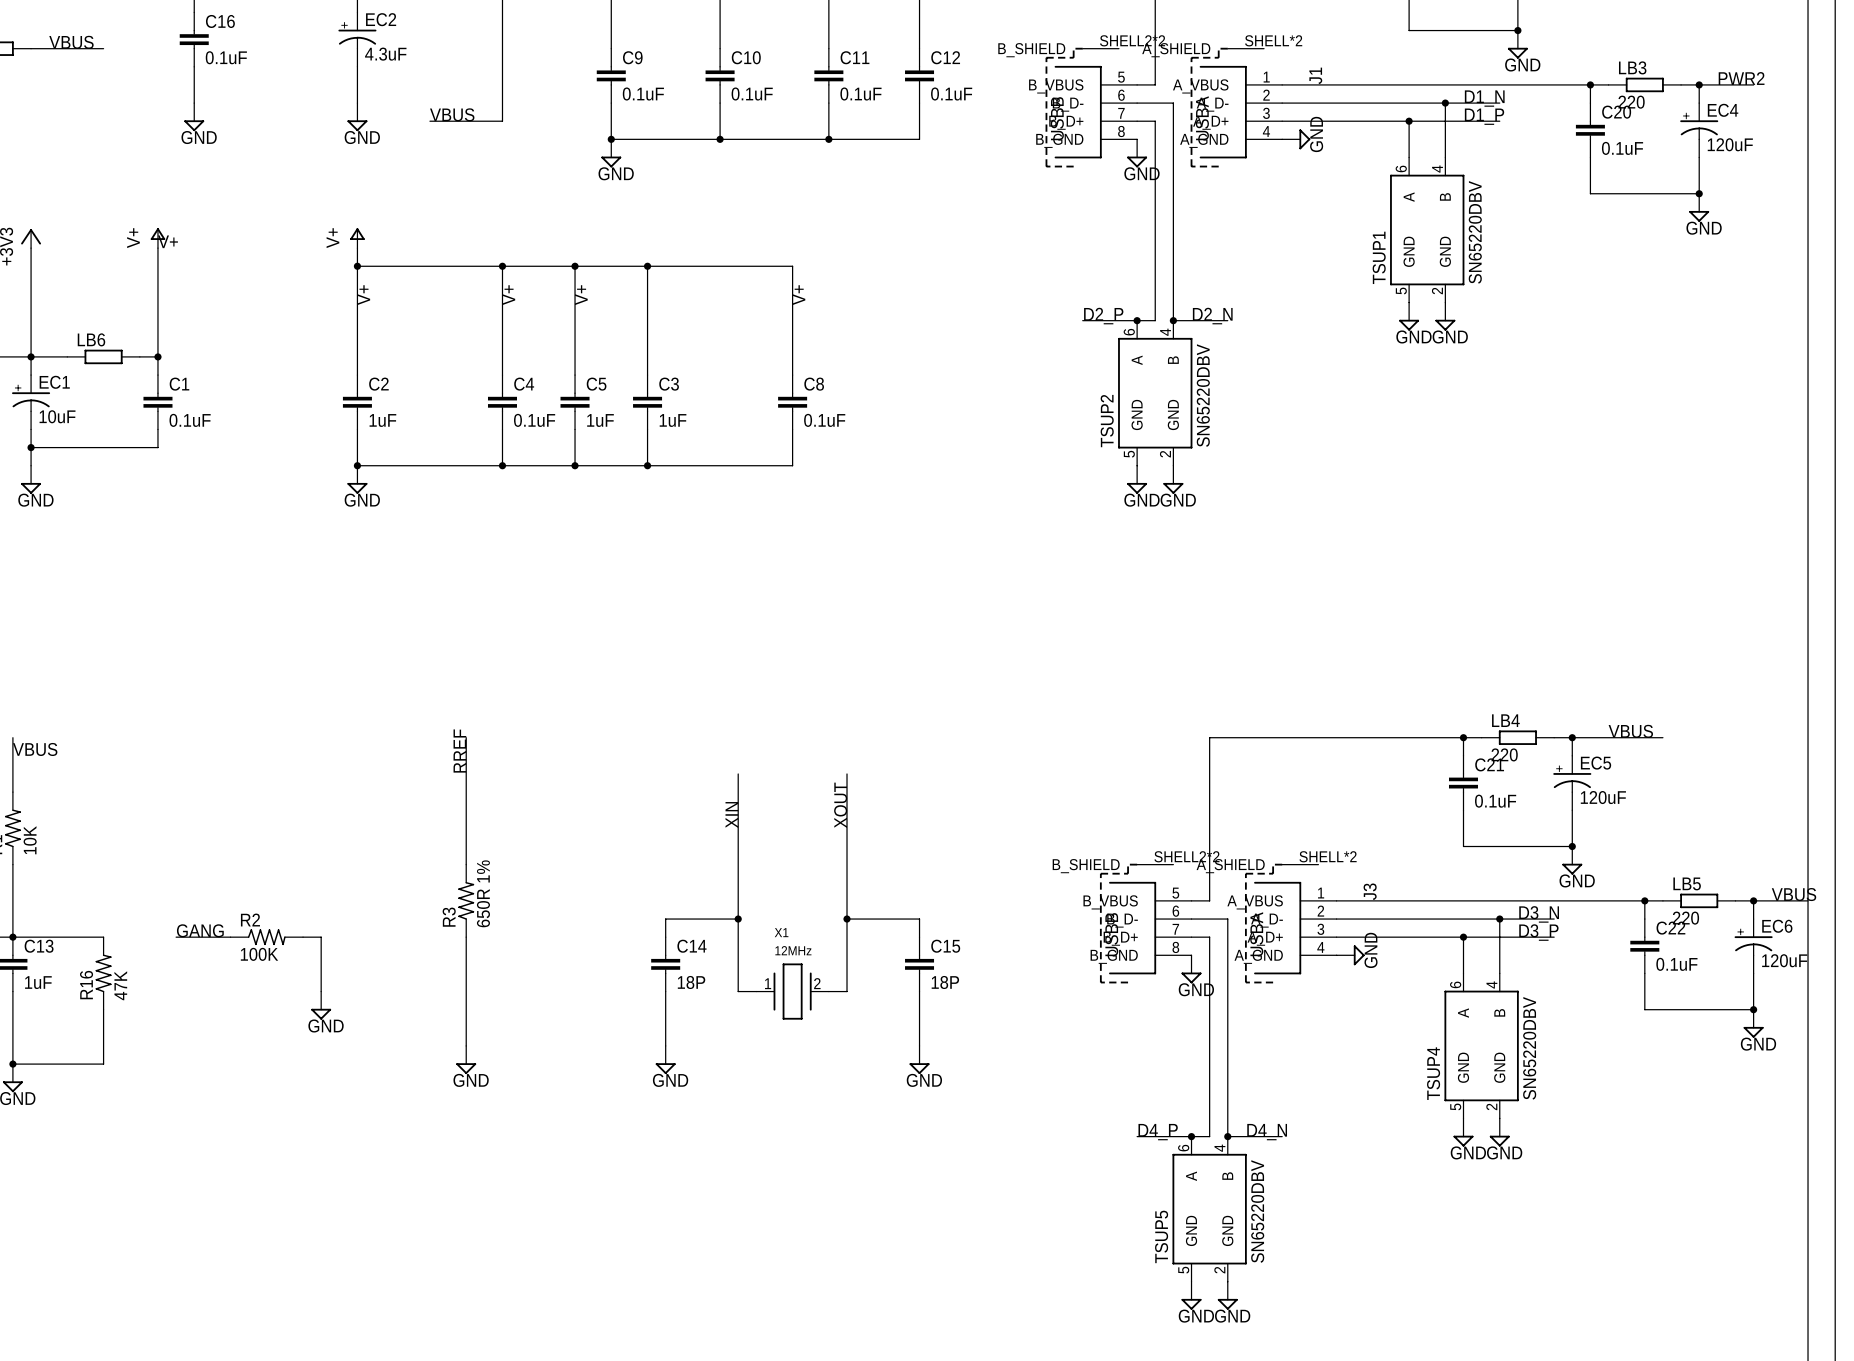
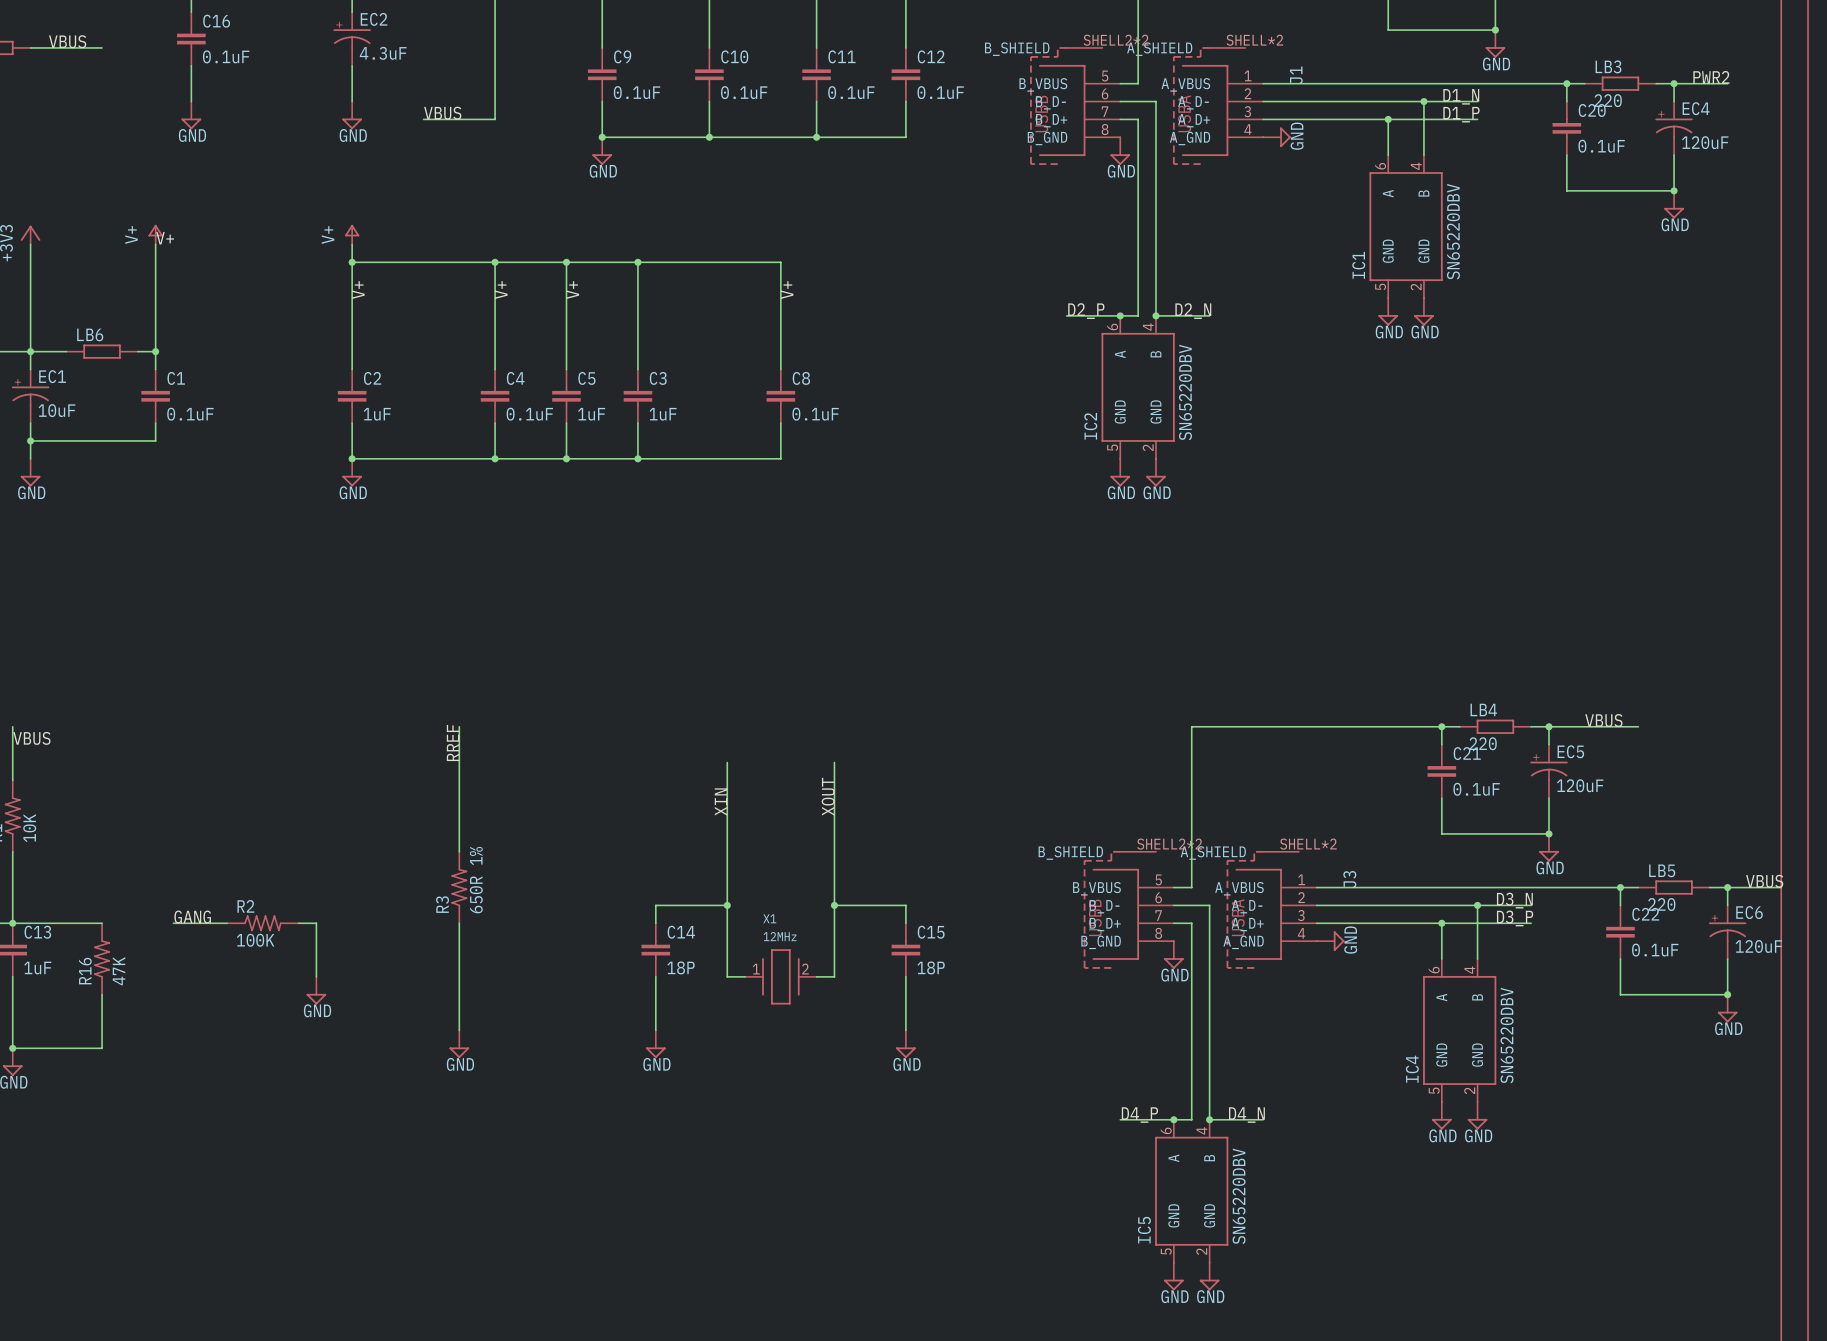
TSUP1 name: TSUP1 (1379, 257) -> IC1 (1358, 265)
TSUP2 name: TSUP2 (1107, 421) -> IC2 (1090, 426)
TSUP4 name: TSUP4 (1433, 1073) -> IC4 (1412, 1069)
TSUP5 name: TSUP5 (1161, 1236) -> IC5 (1144, 1230)

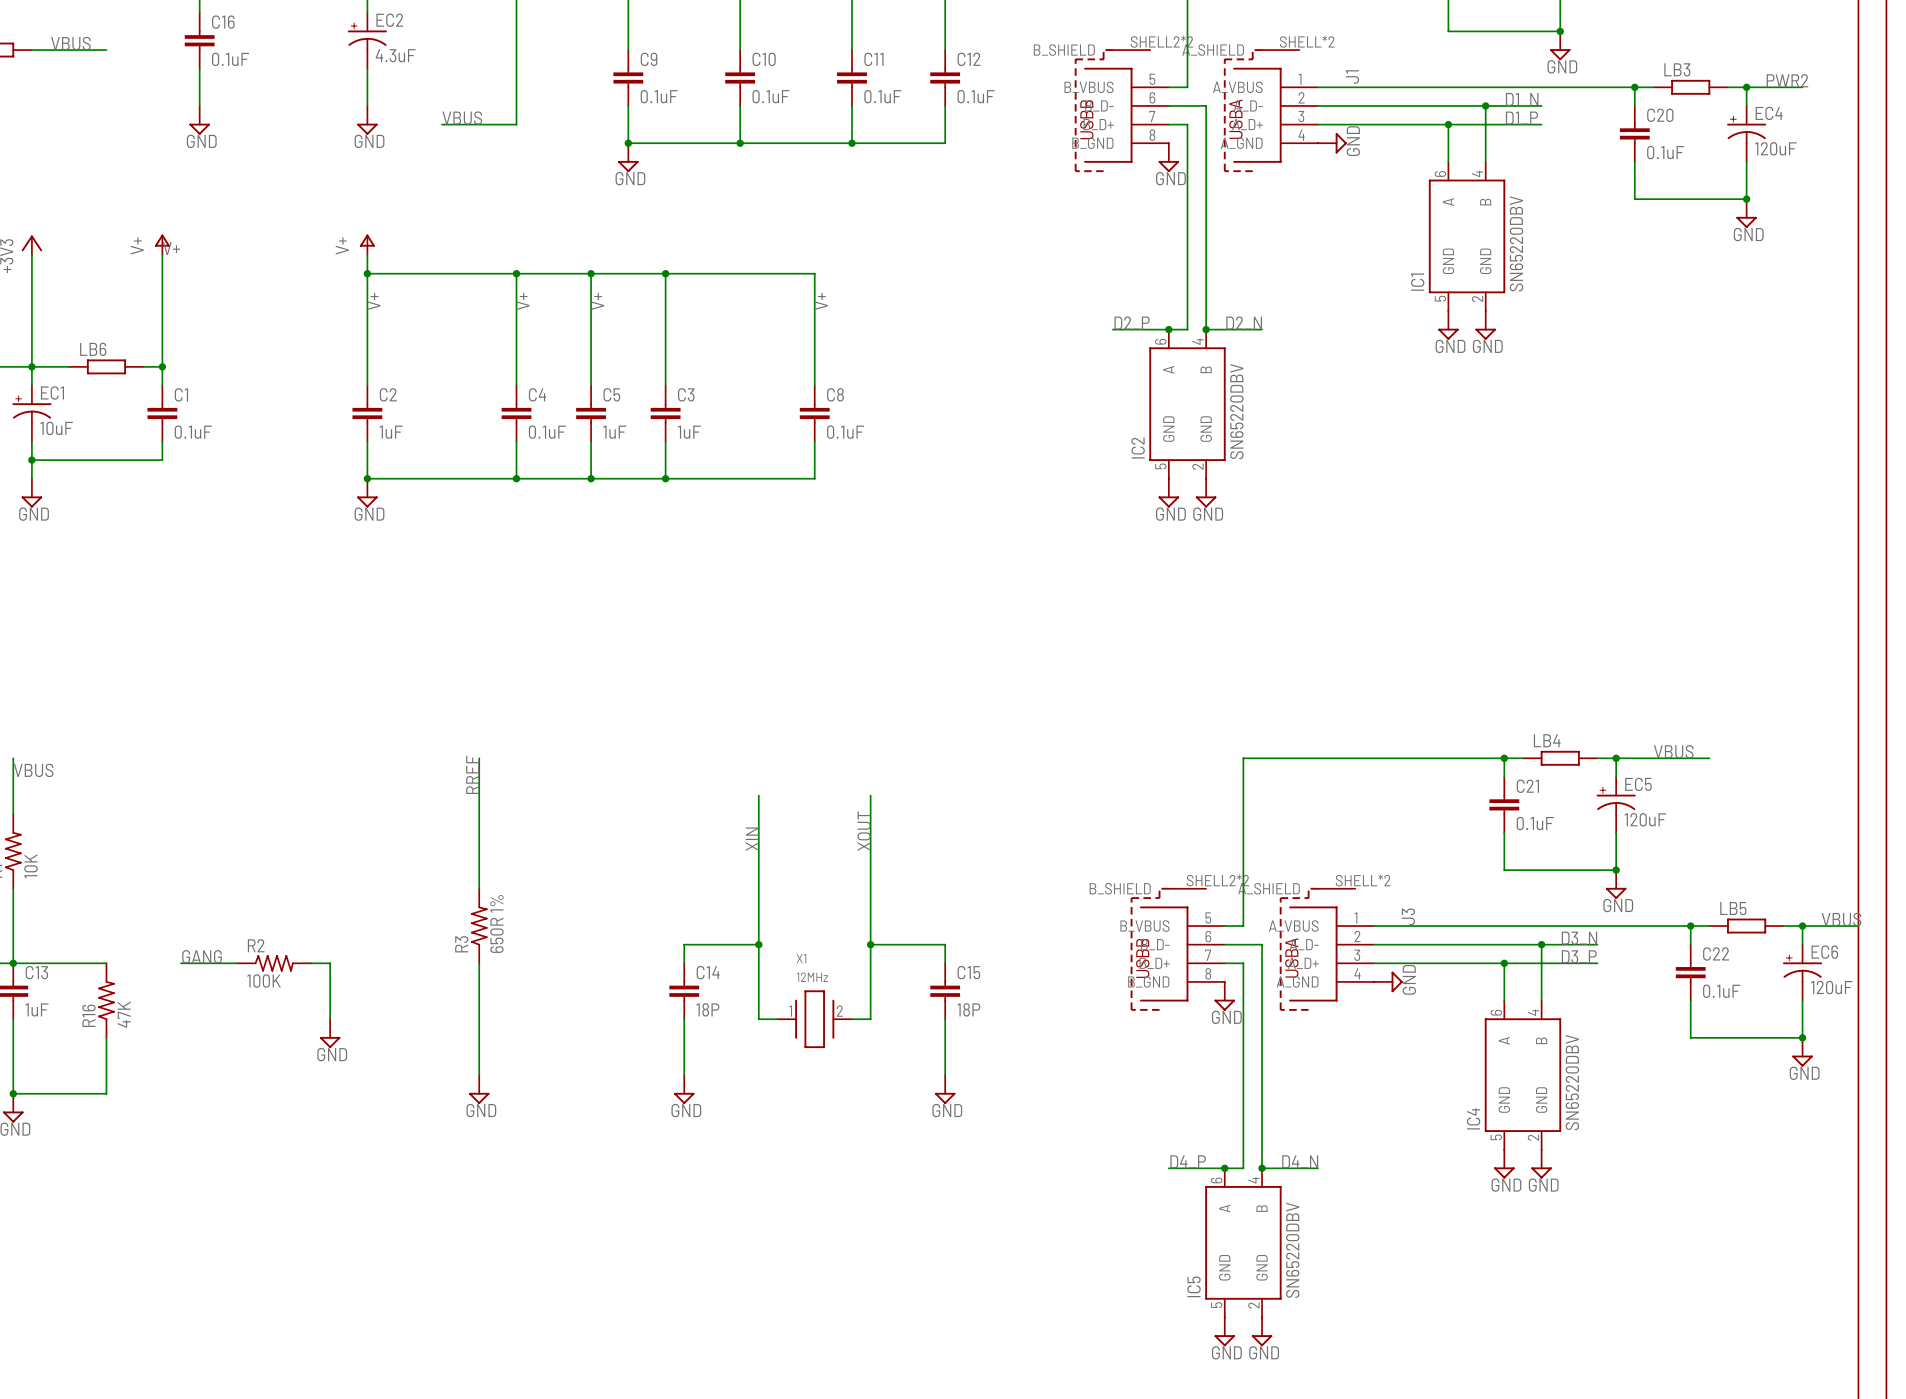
LB3 value: 220 (1608, 100) -> none
LB4 value: 220 (1483, 743) -> none
LB5 value: 220 (1661, 904) -> none

